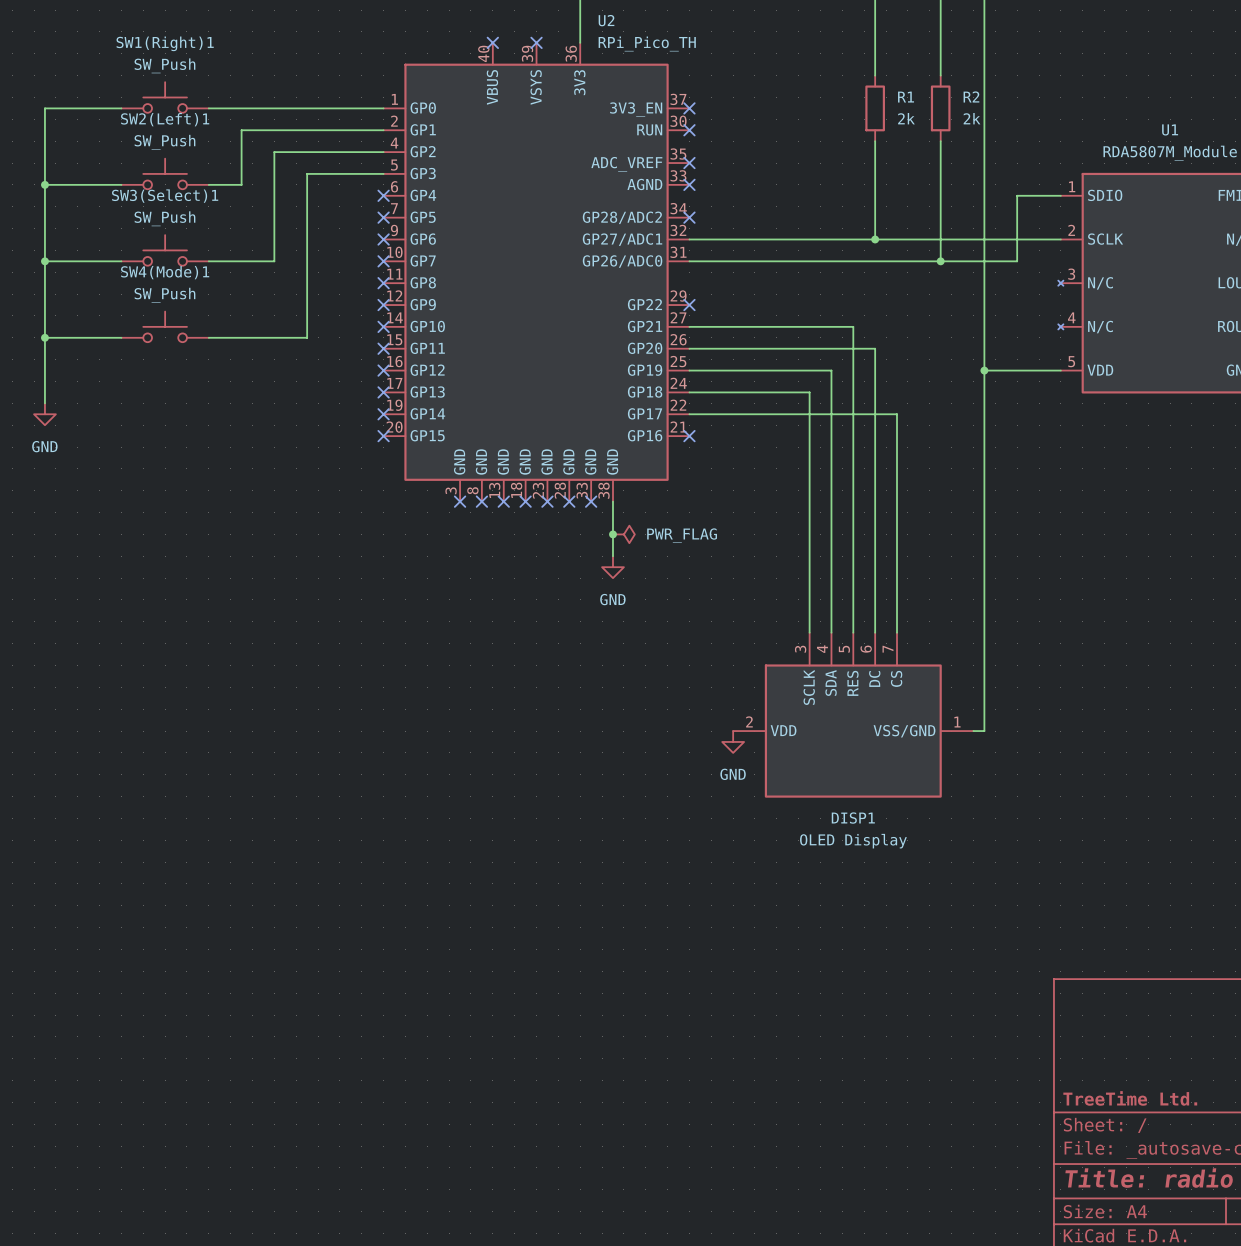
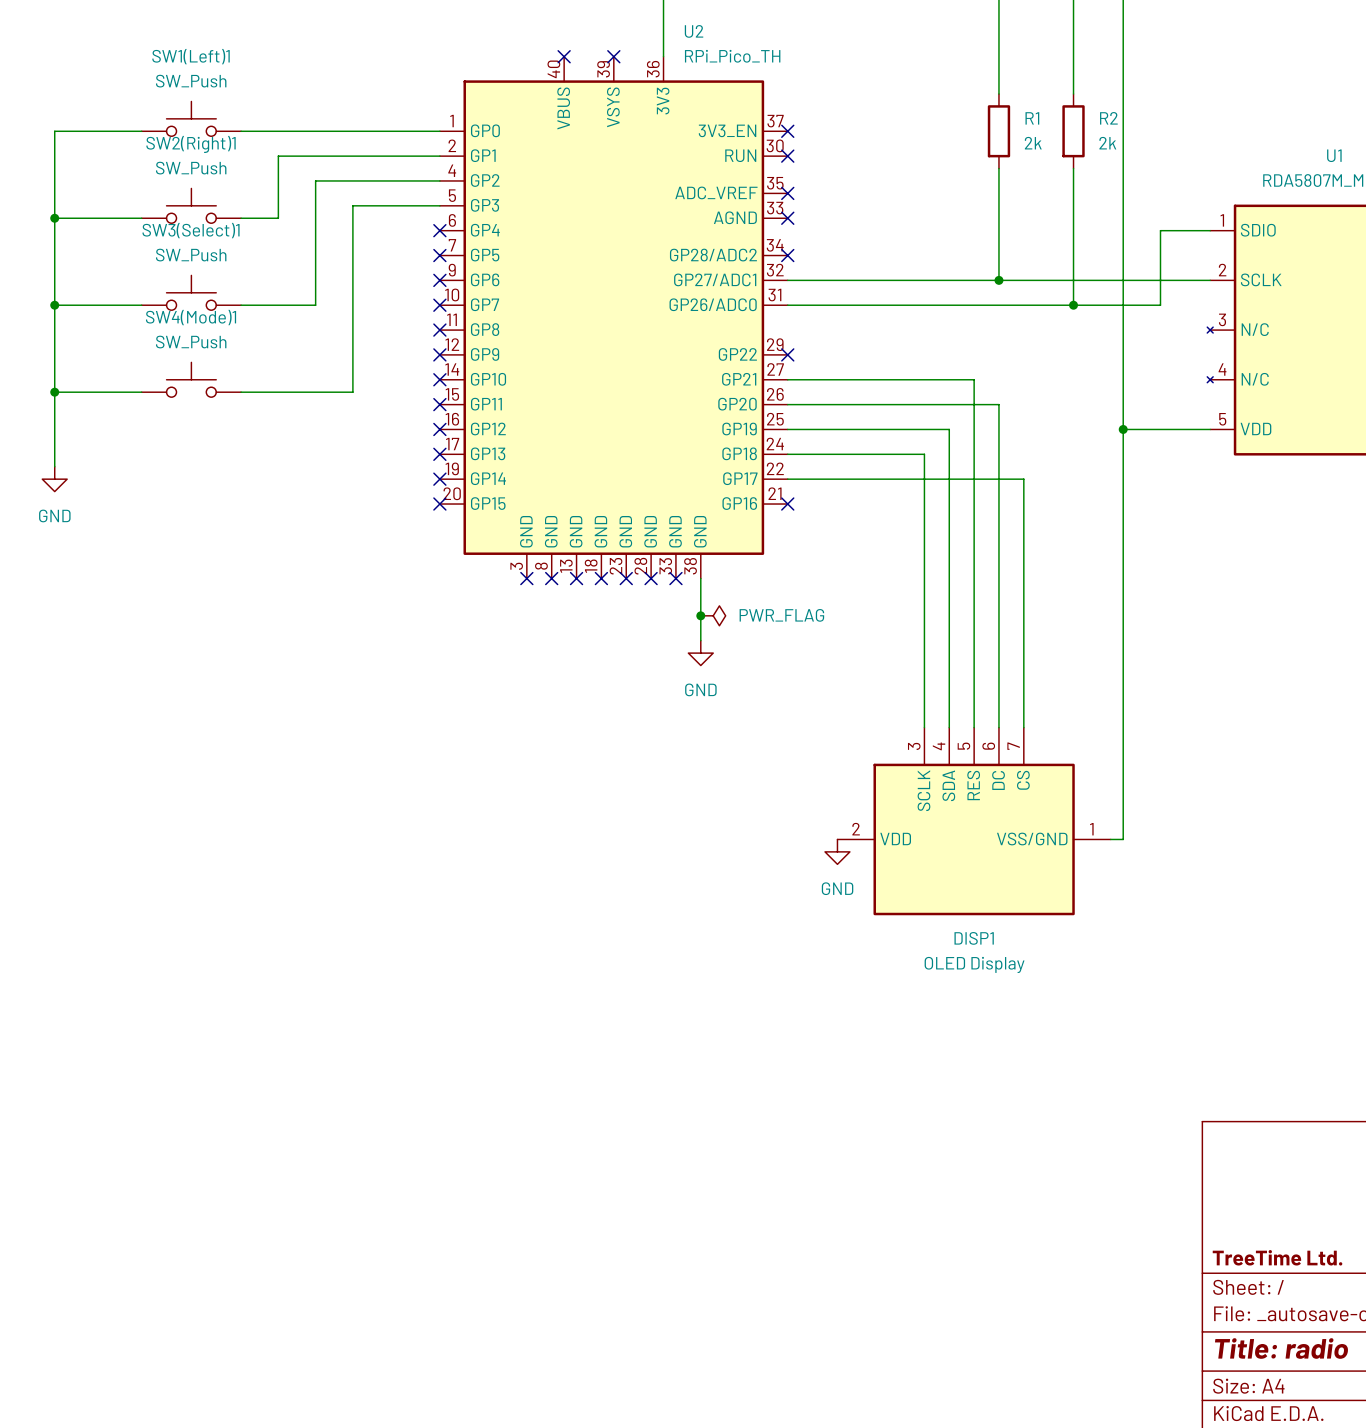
SW1(Right)1 name: SW1(Right)1 (165, 43) -> SW1(Left)1 (191, 56)
SW2(Left)1 name: SW2(Left)1 (165, 119) -> SW2(Right)1 (191, 144)

